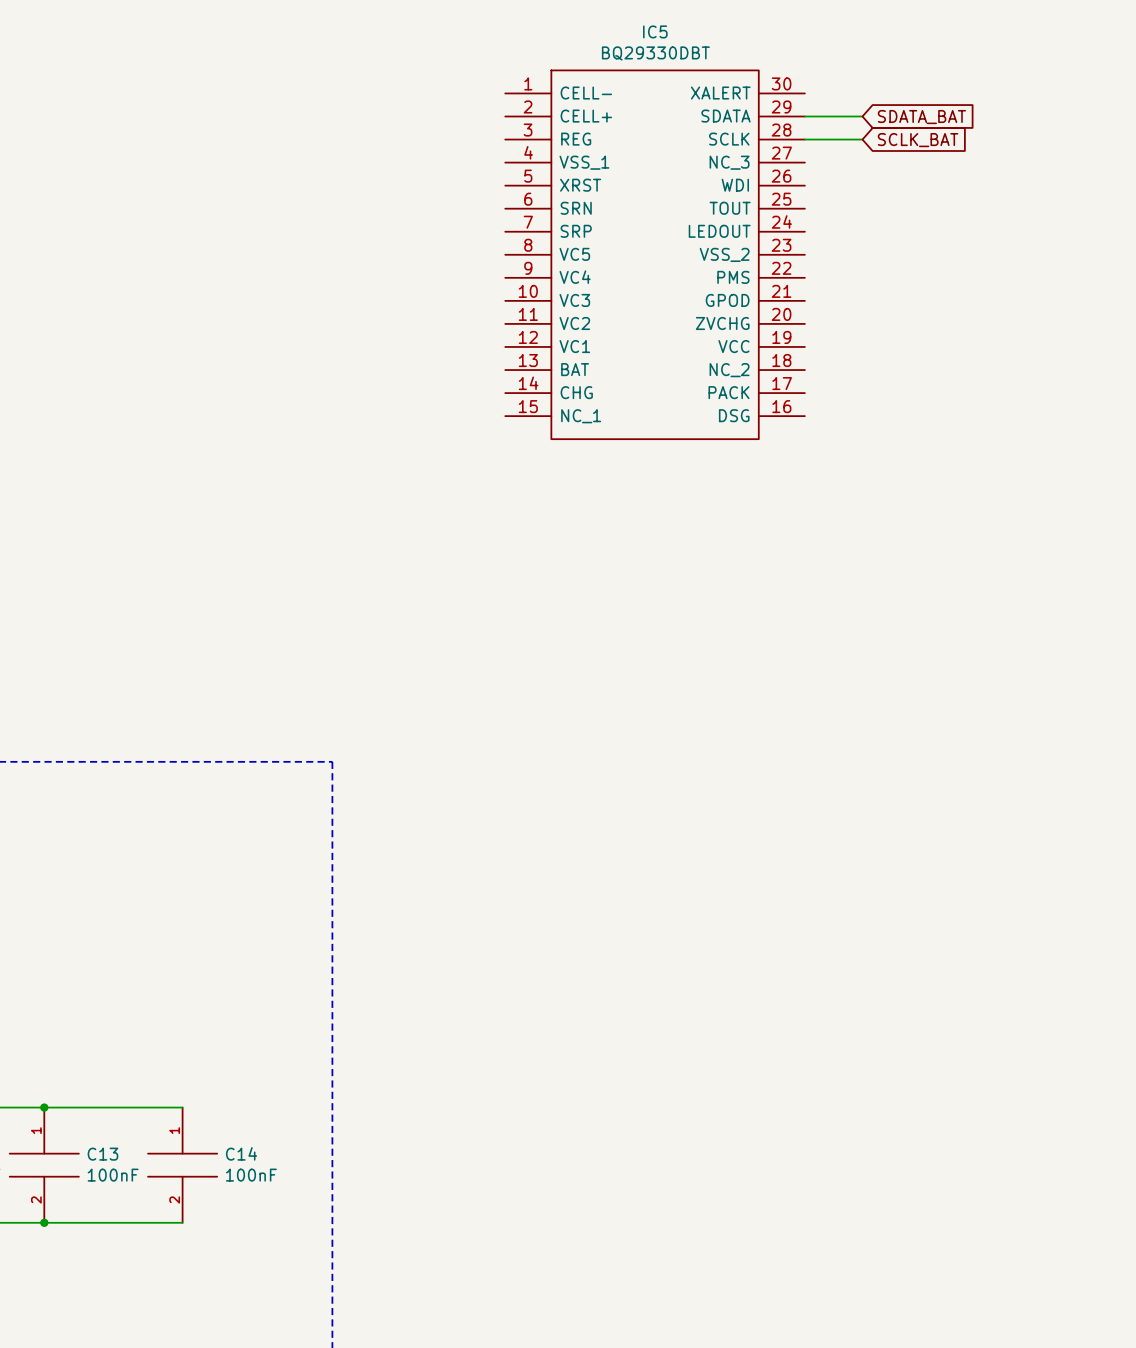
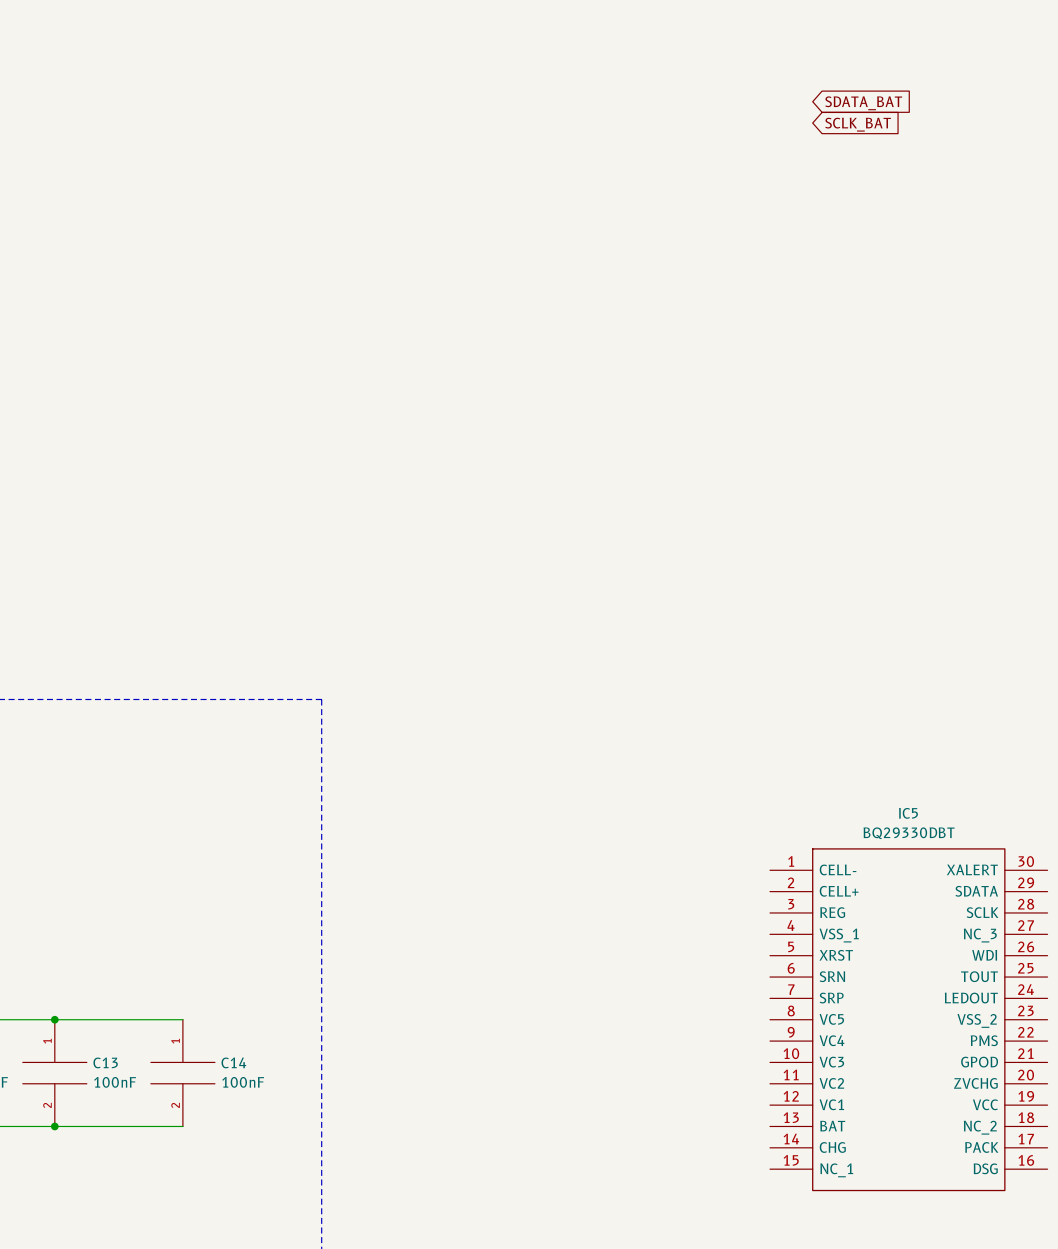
wire: (804, 116) (862, 116) -> none
wire: (804, 139) (862, 139) -> none
IC5 position: (655, 254) -> (908, 1019)

